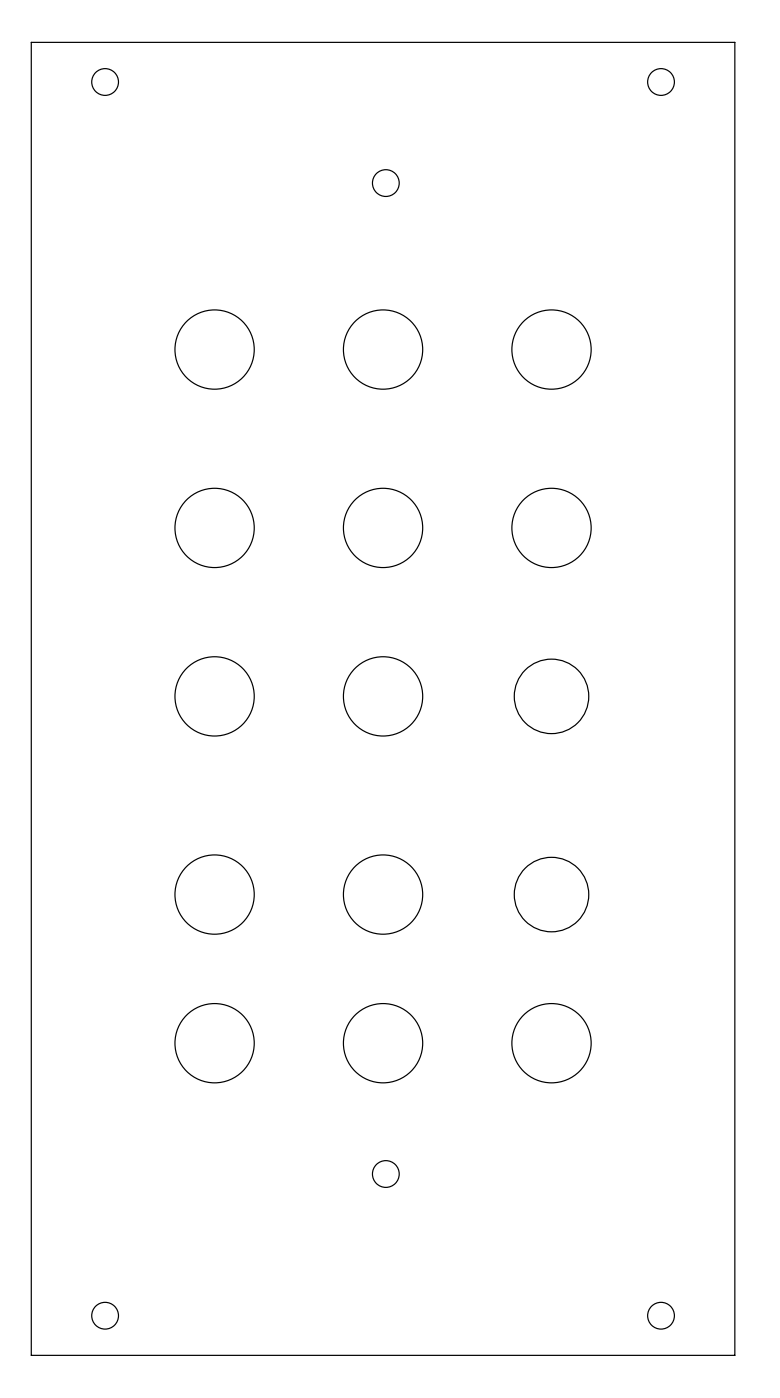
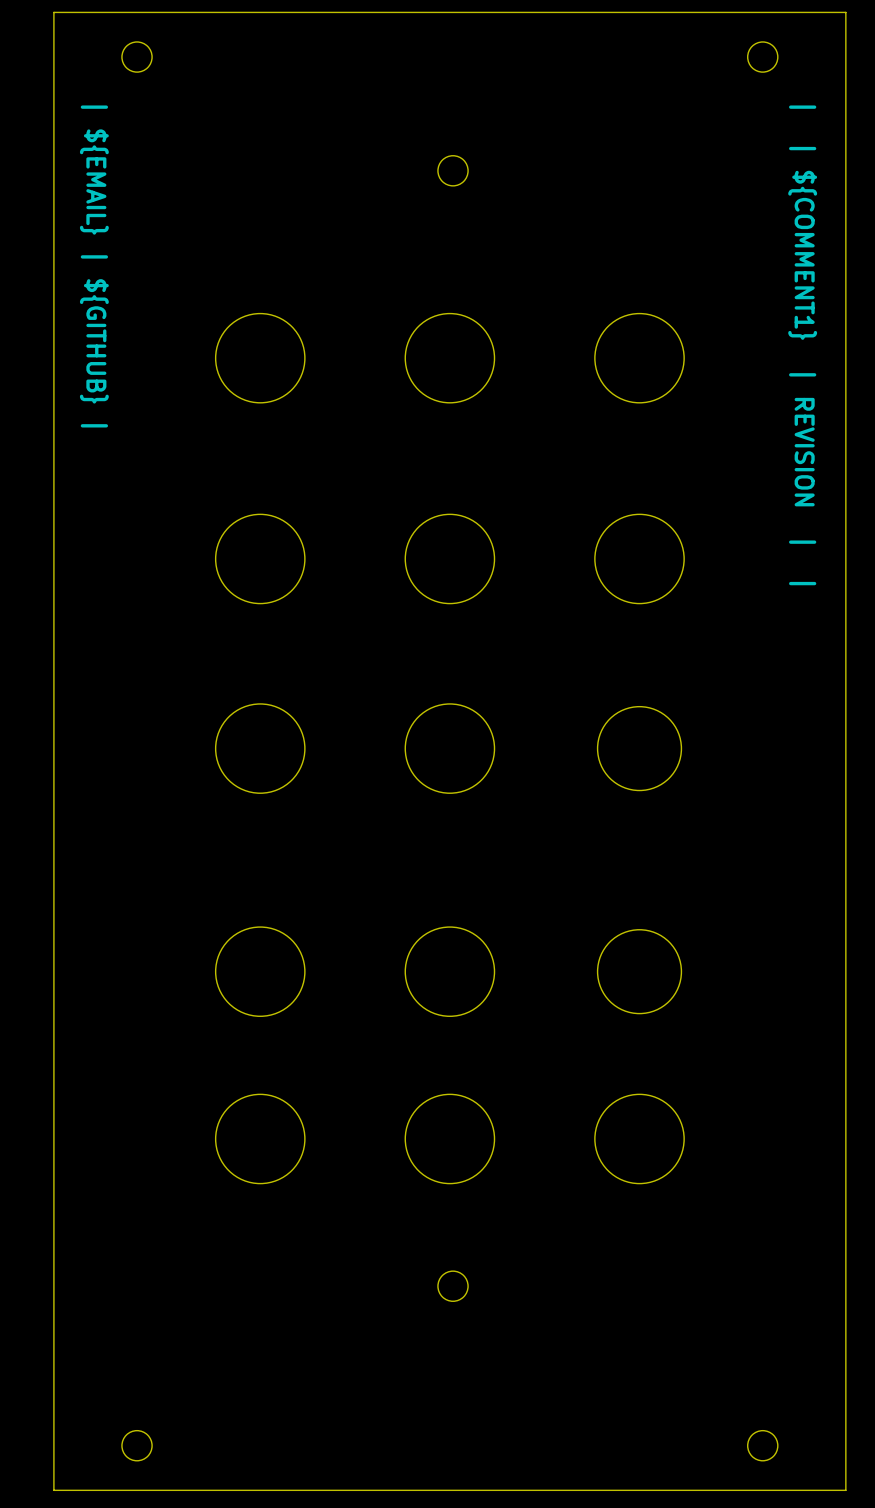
text: none -> | ${EMAIL} | ${GITHUB} | (94, 266)
text: none -> | | ${COMMENT1} | REVISION | | (802, 345)

